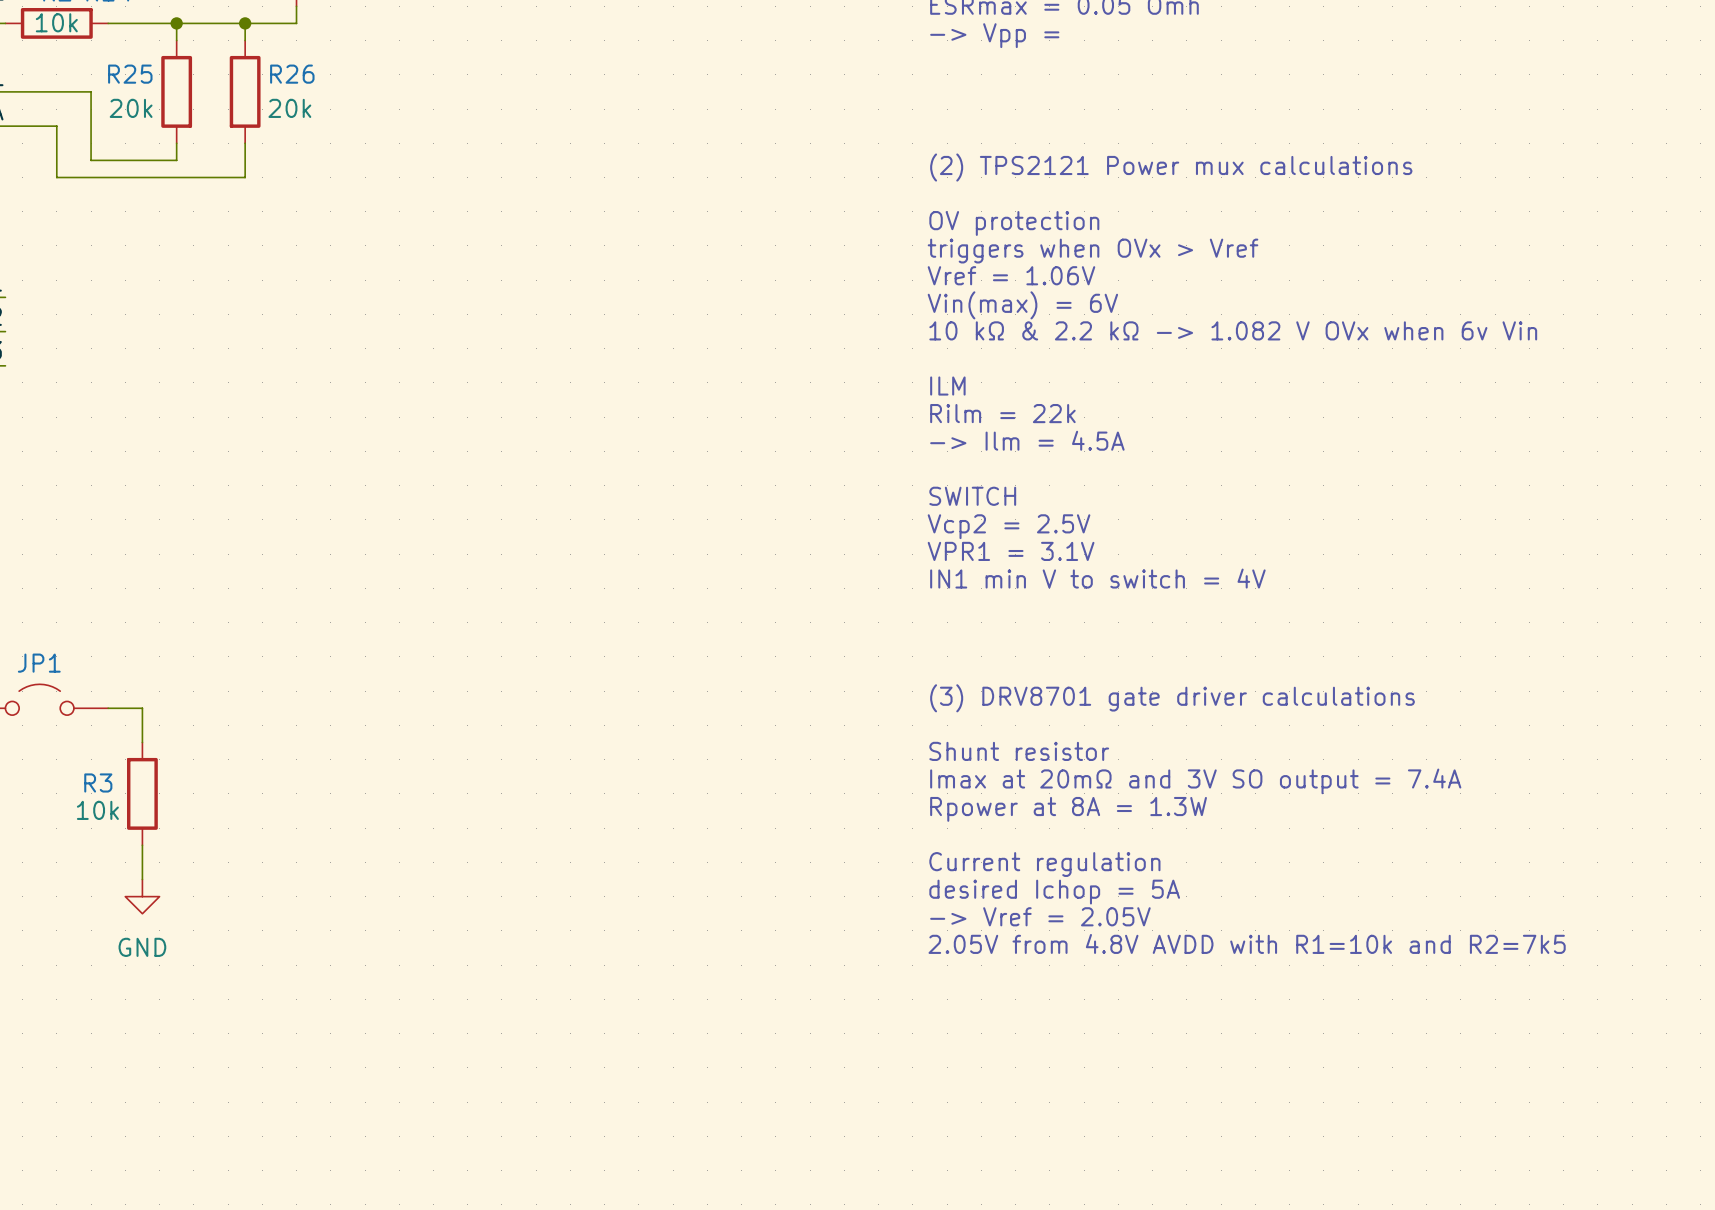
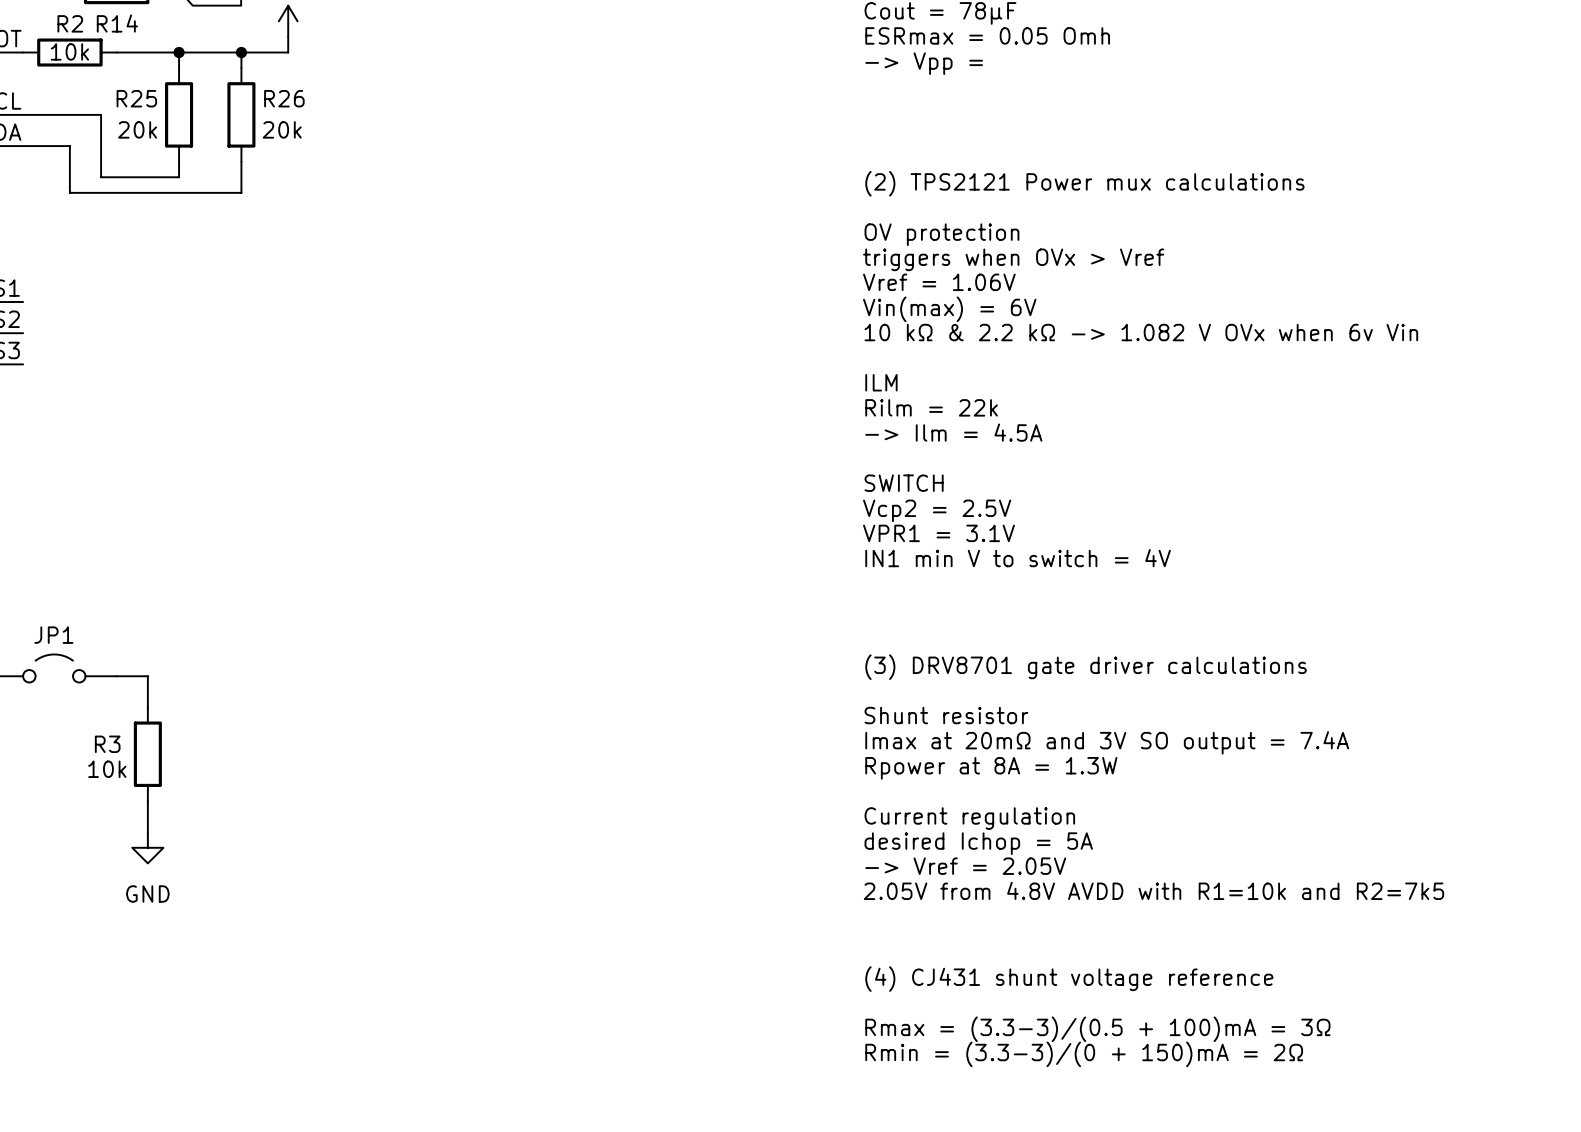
text: none -> (4) CJ431 shunt voltage reference (1069, 979)
text: none -> Rmax = (3.3-3)/(0.5 + 100)mA = 3Ω (1097, 1029)
text: none -> Rmin = (3.3-3)/(0 + 150)mA = 2Ω (1084, 1054)

